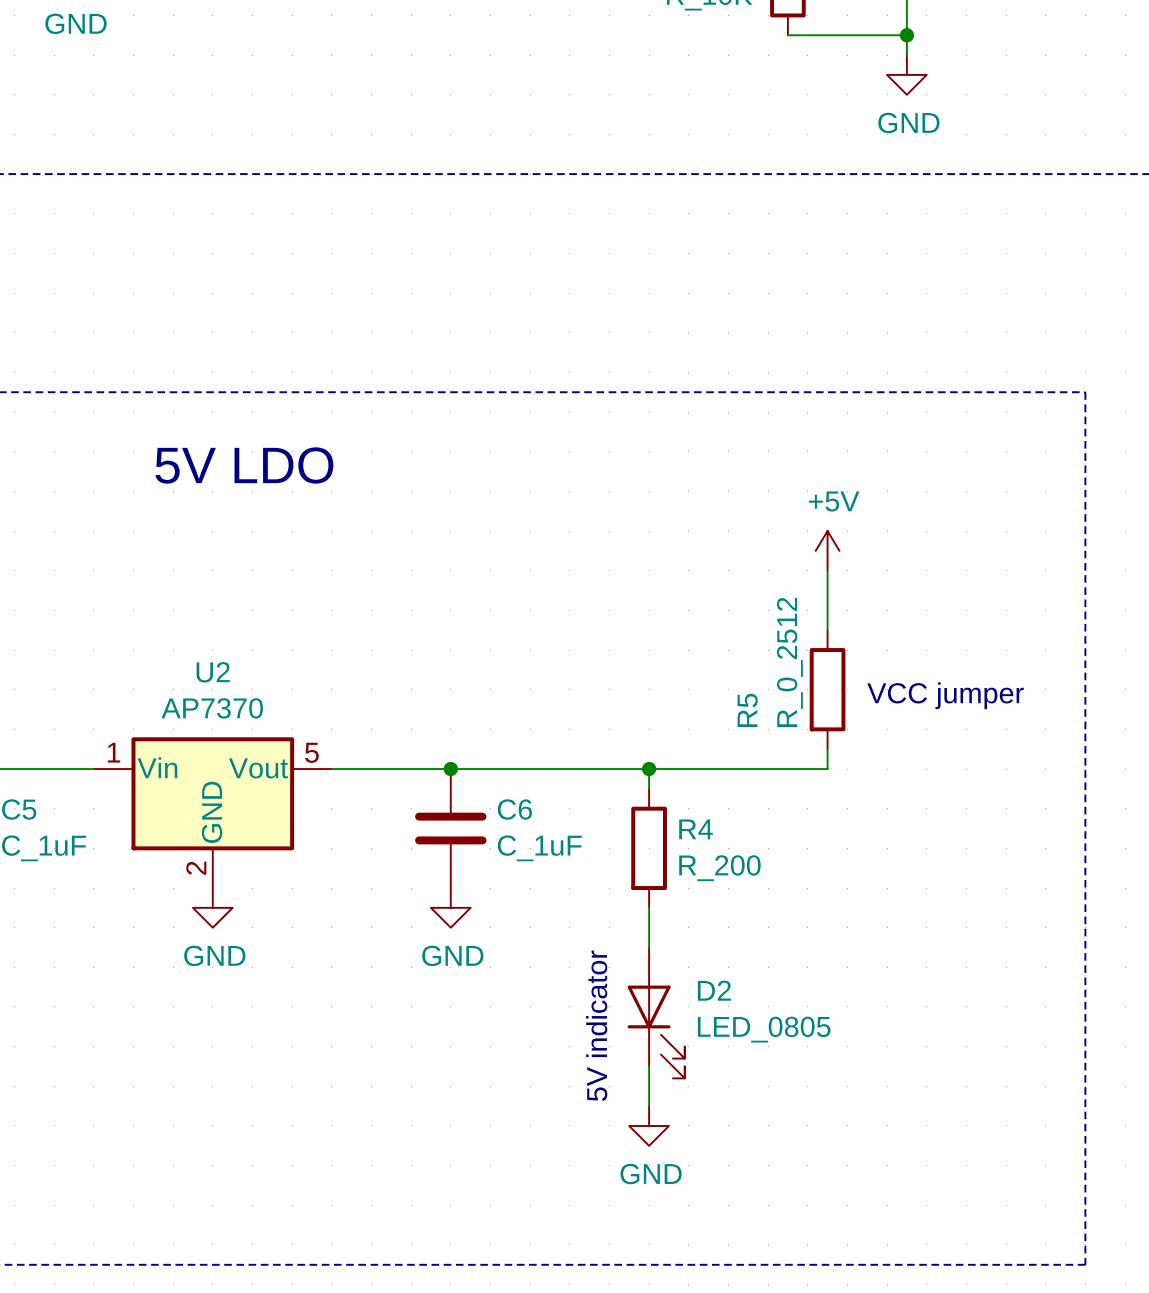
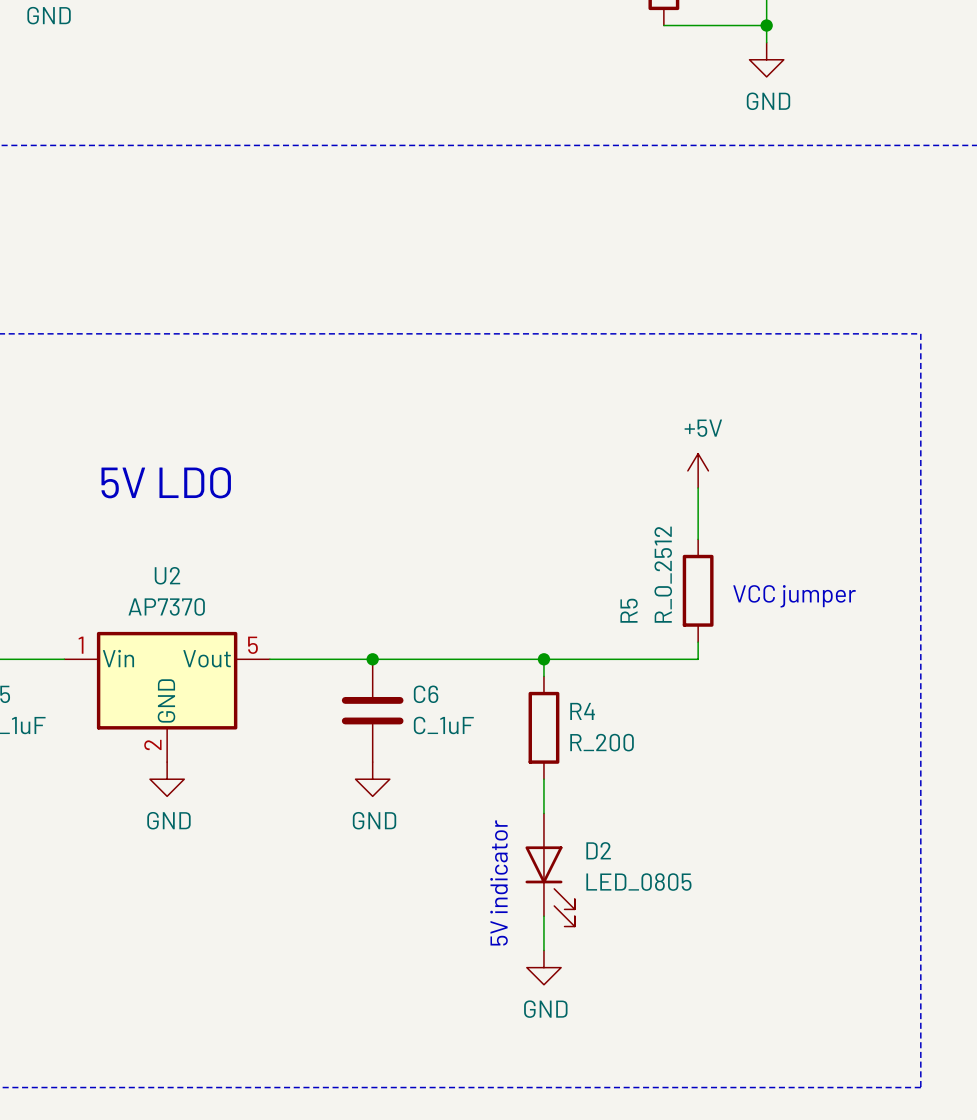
text position: 5V LDO (244, 465) -> 5V LDO (166, 482)

